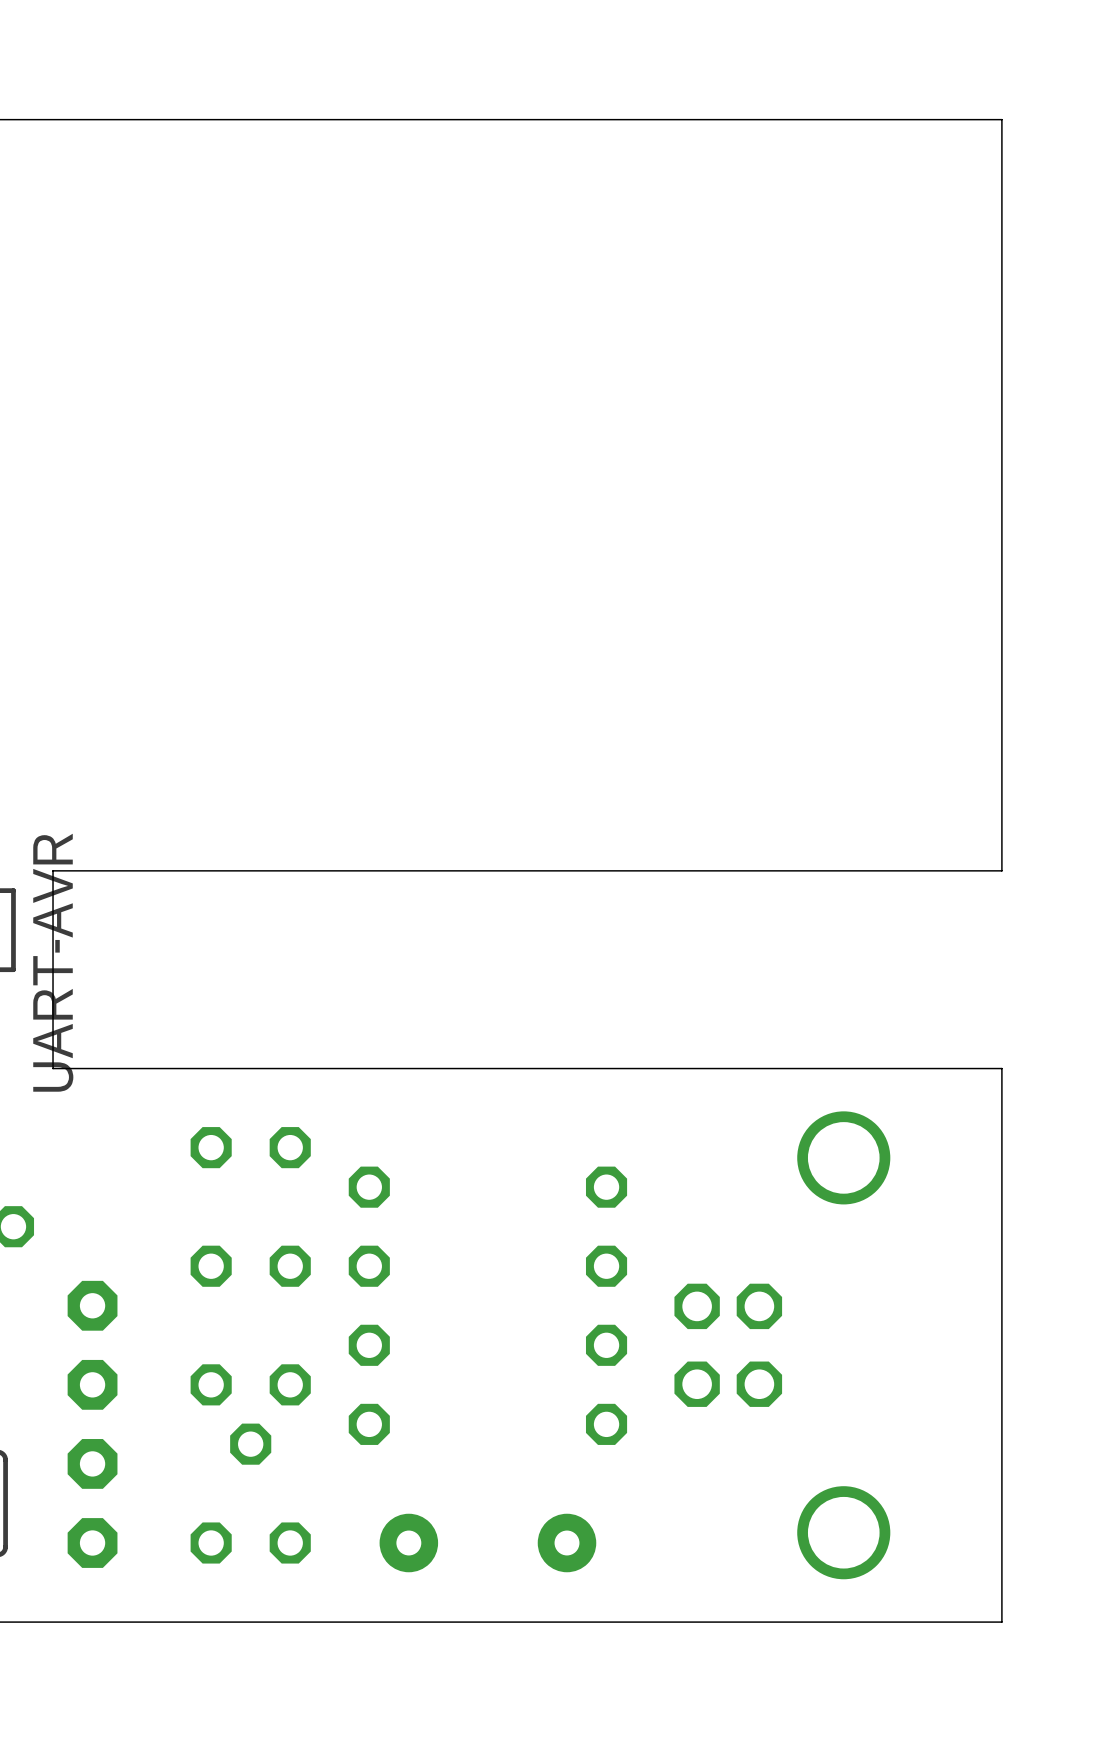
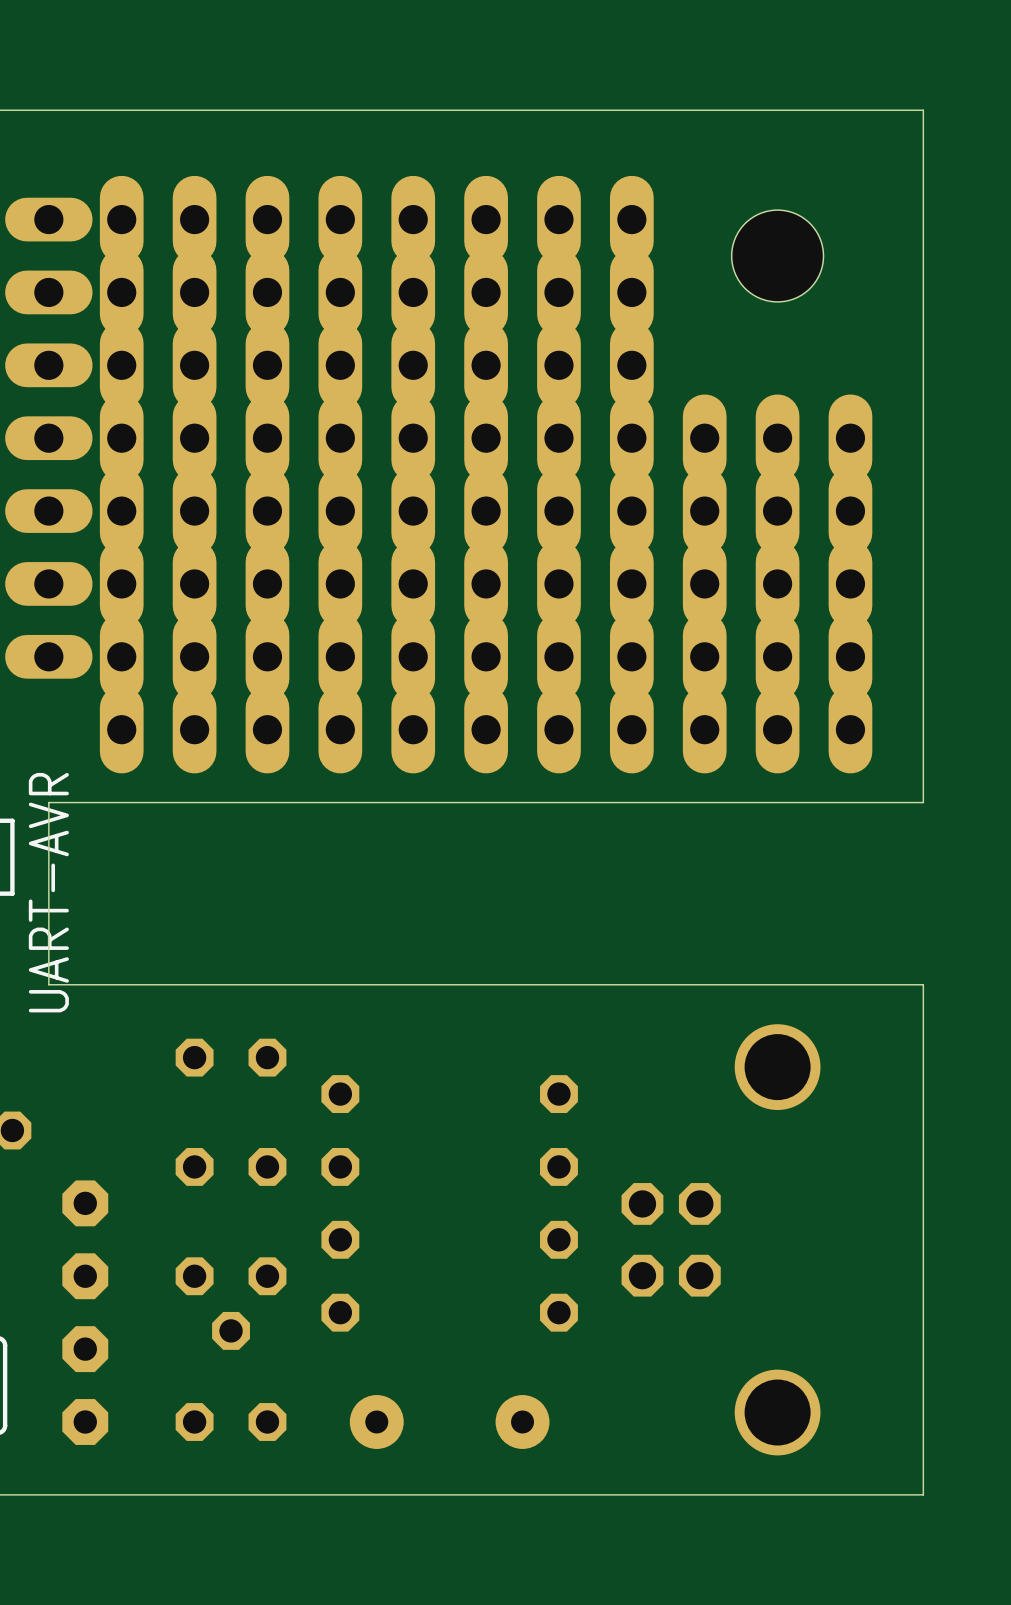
part: none -> (376, 219)
part: none -> (777, 256)
part: none -> (376, 292)
part: none -> (376, 365)
part: none -> (48, 438)
part: none -> (486, 438)
part: none -> (486, 511)
part: none -> (486, 583)
part: none -> (486, 656)
part: none -> (486, 729)

